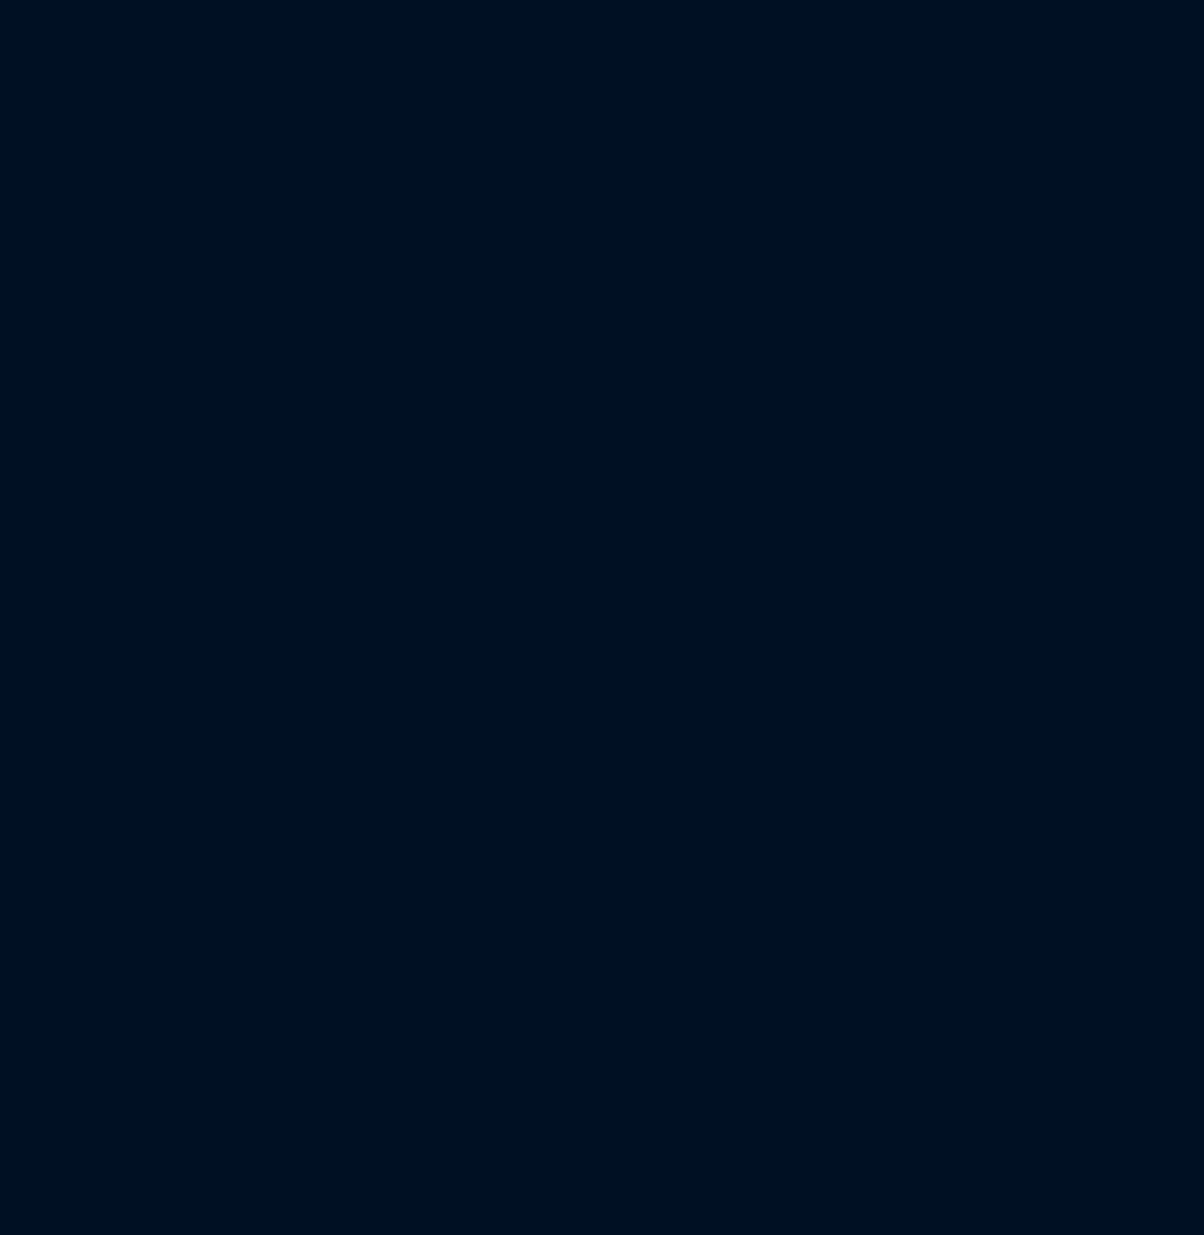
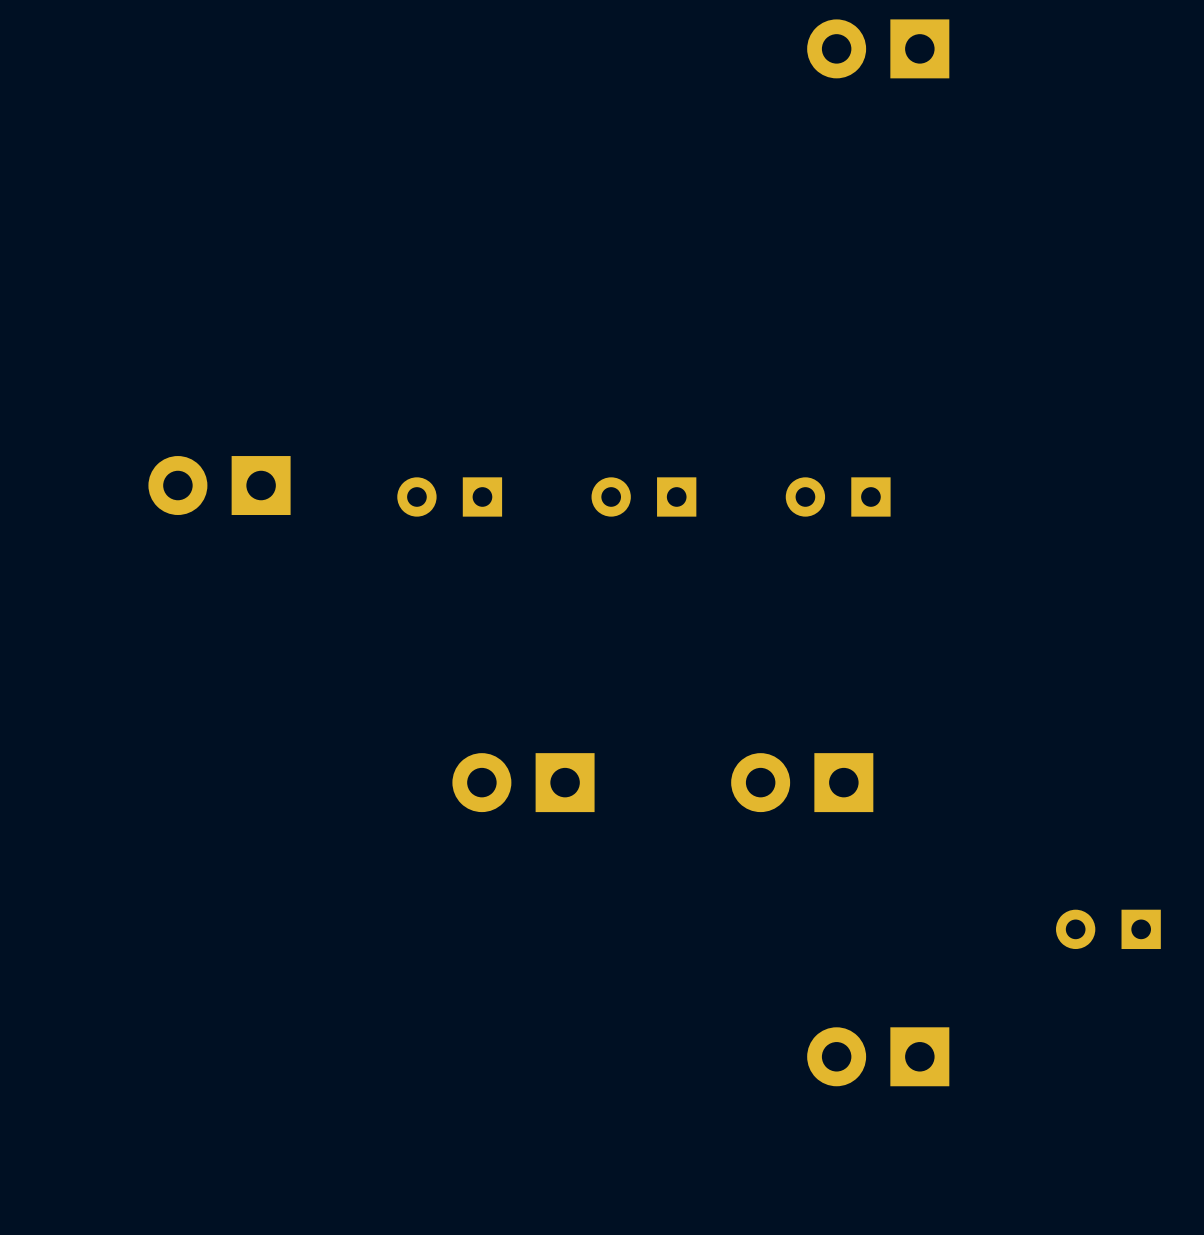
part: none -> (878, 48)
part: none -> (219, 485)
part: none -> (449, 496)
part: none -> (643, 496)
part: none -> (838, 496)
part: none -> (523, 782)
part: none -> (802, 782)
part: none -> (1108, 929)
part: none -> (878, 1056)

